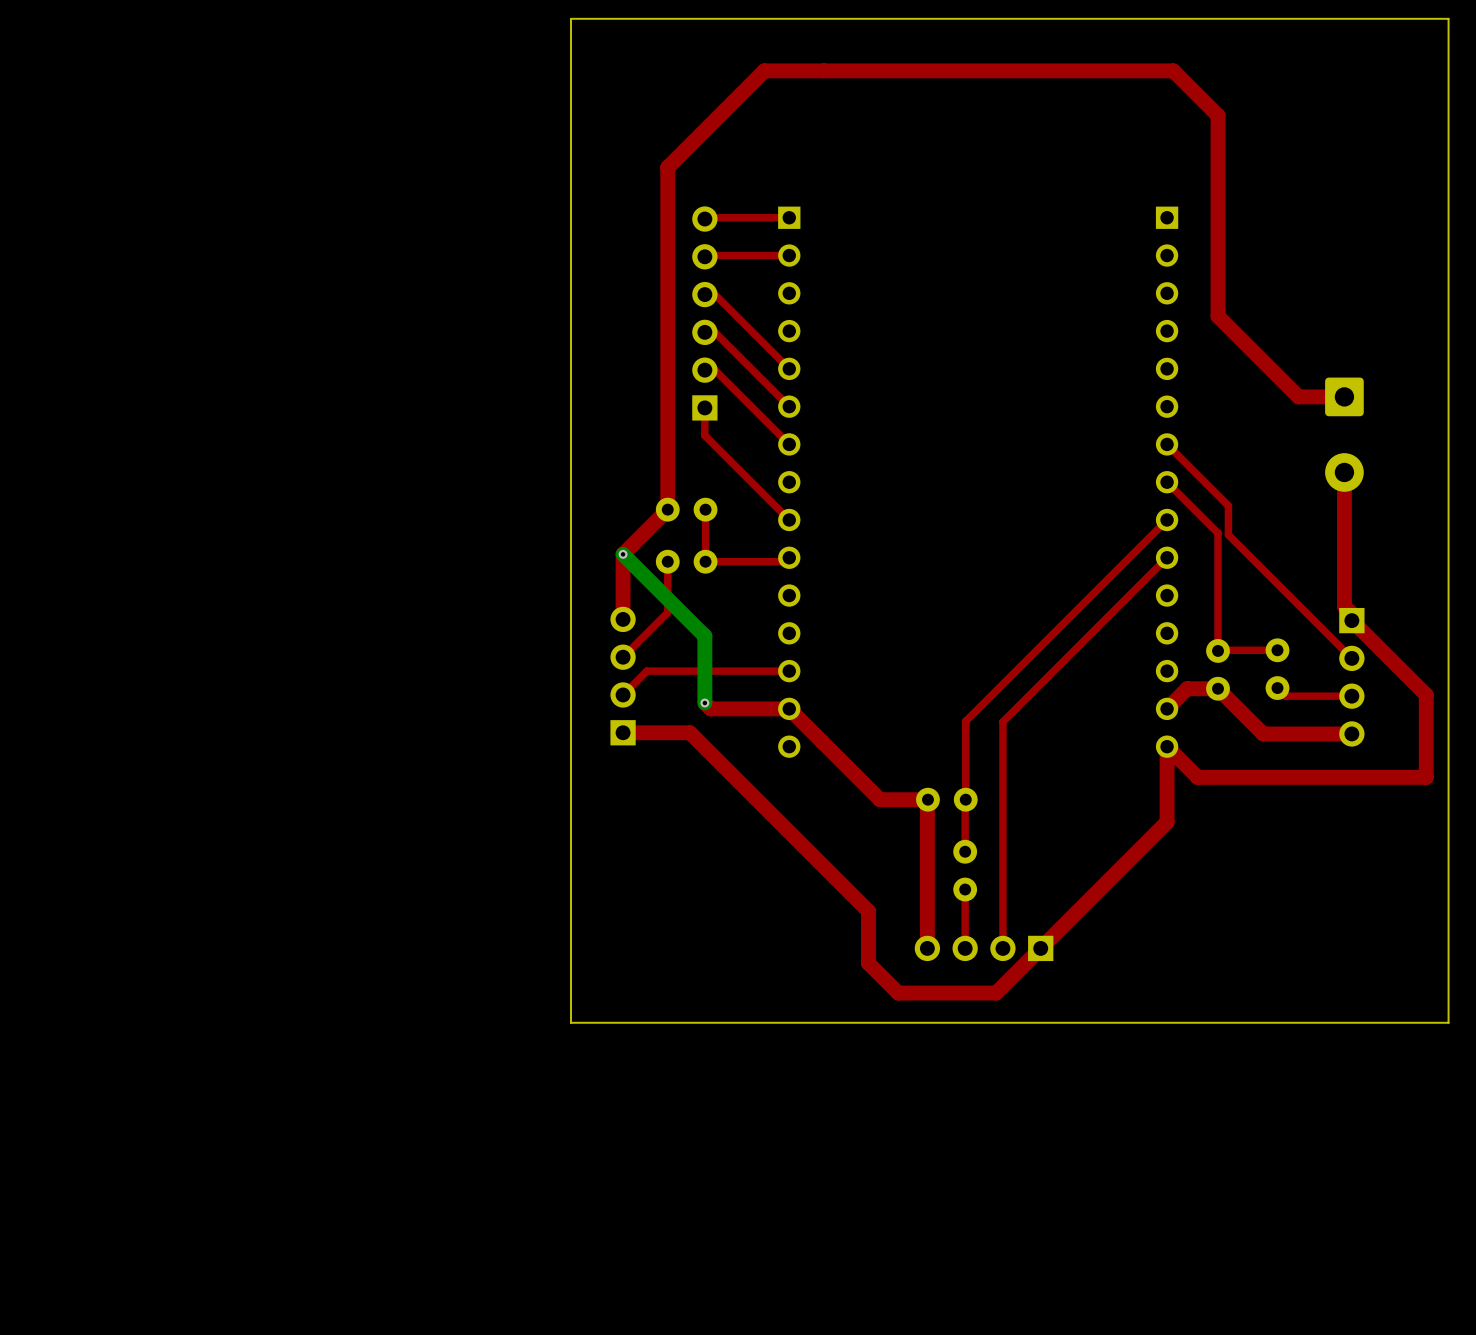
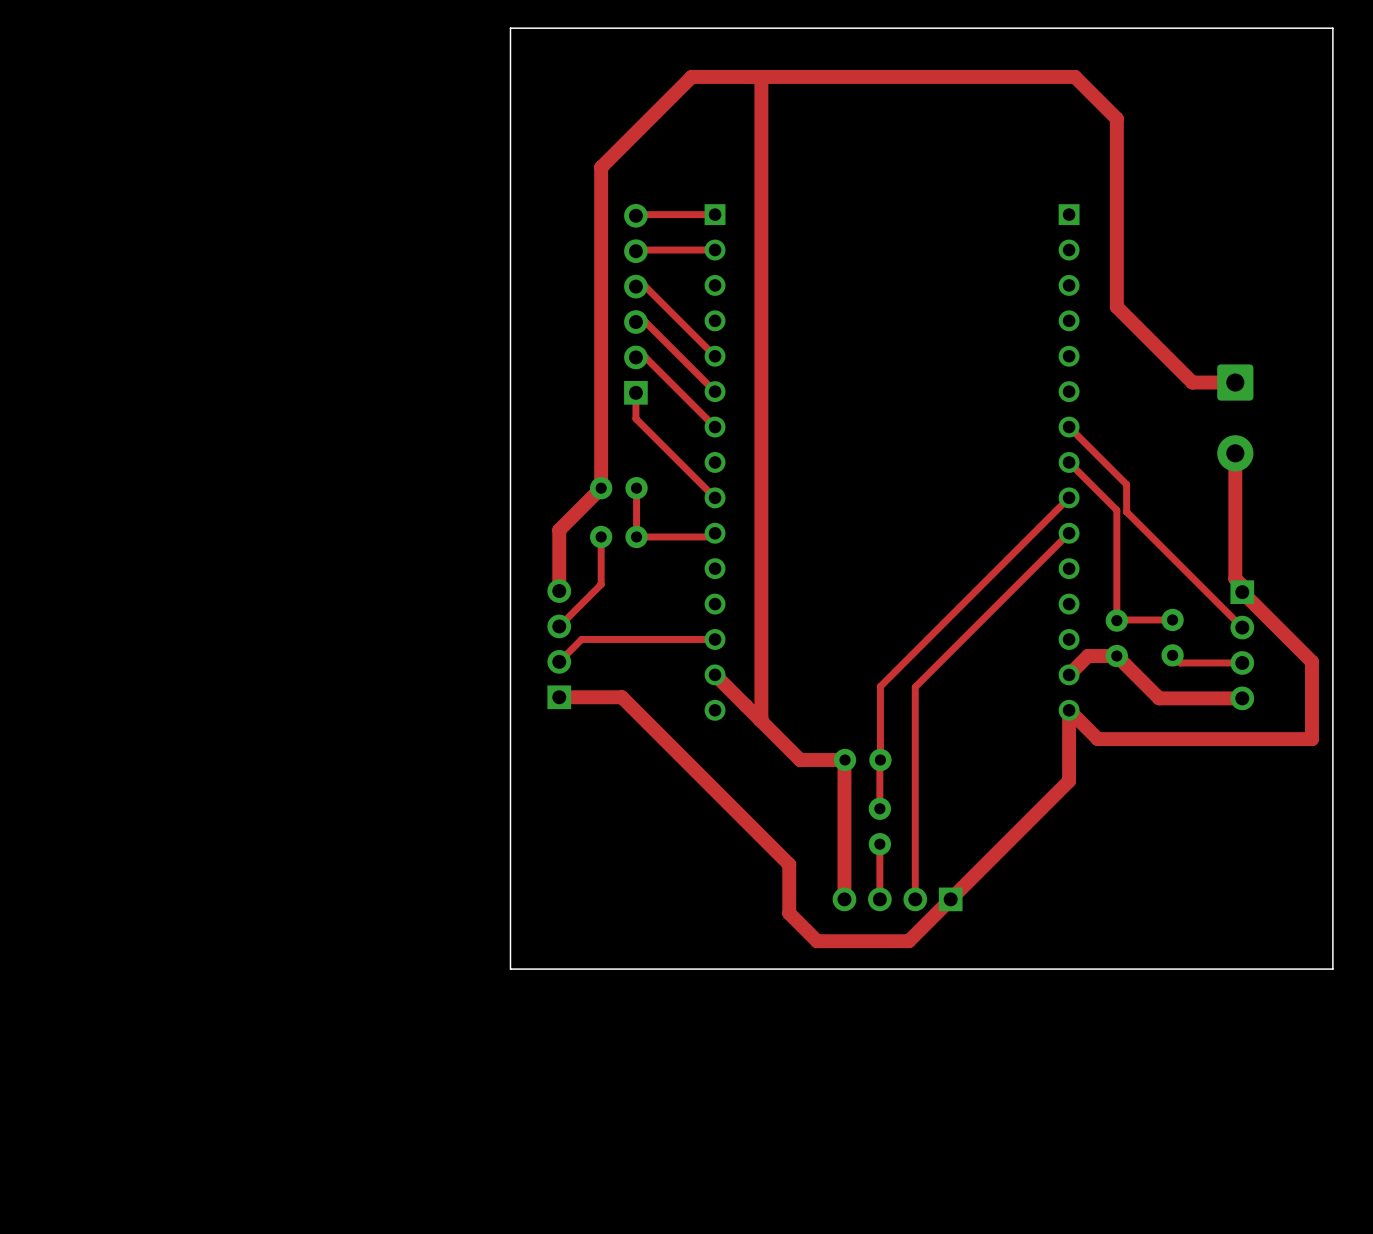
top track: none -> (761, 76) (761, 718) (759, 719)
bottom track: (623, 554) (704, 636) (704, 703) -> none
via: (623, 554) -> none
top track: (704, 703) (710, 708) (789, 708) -> none
via: (704, 703) -> none

